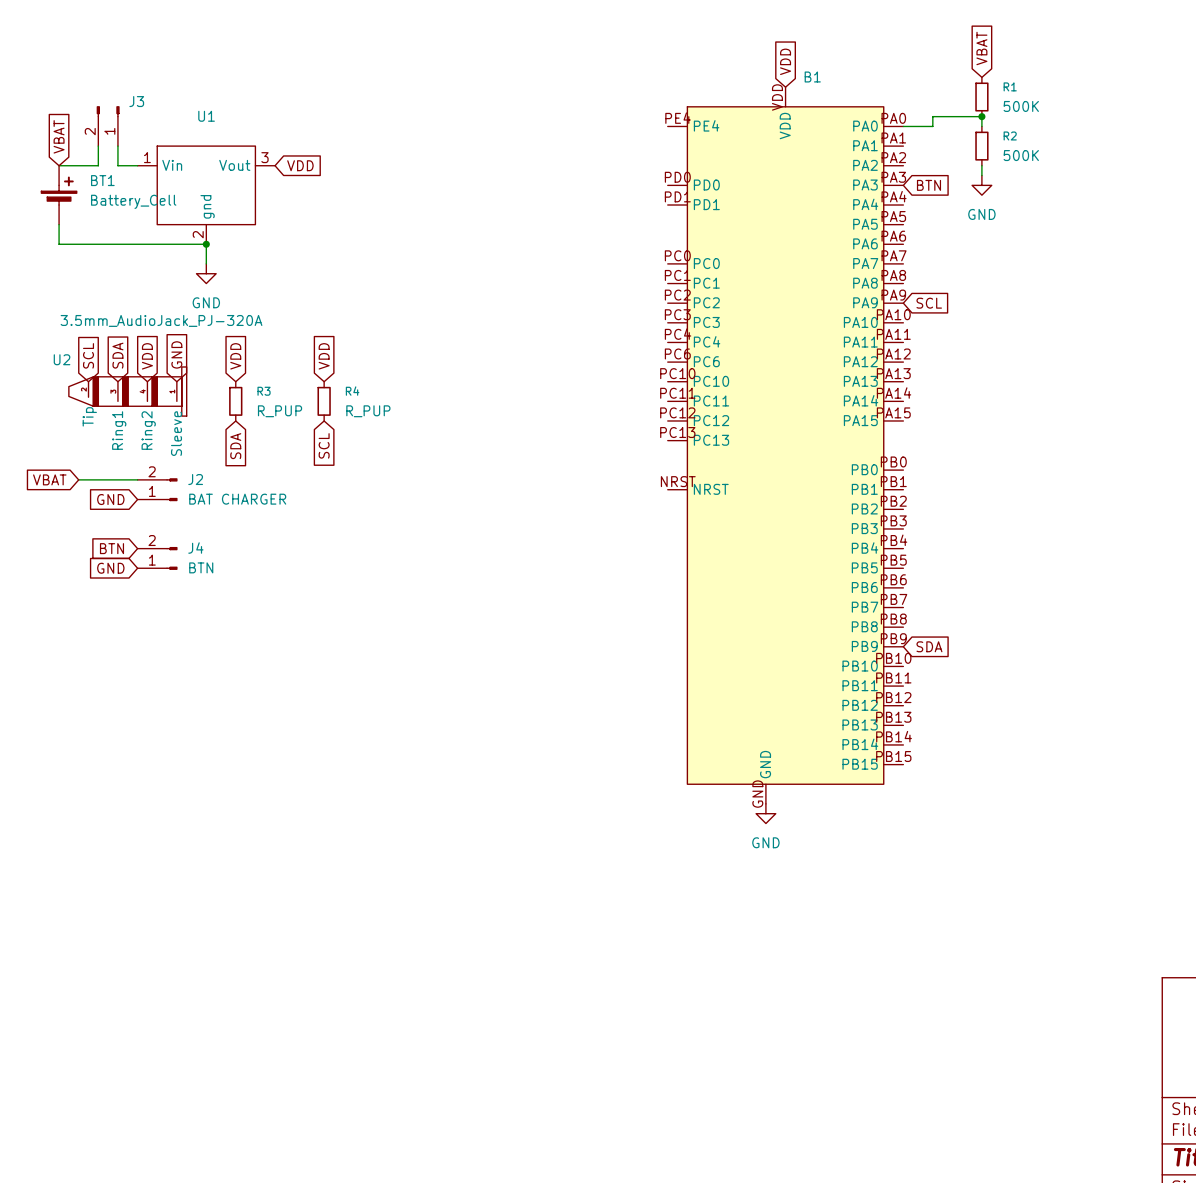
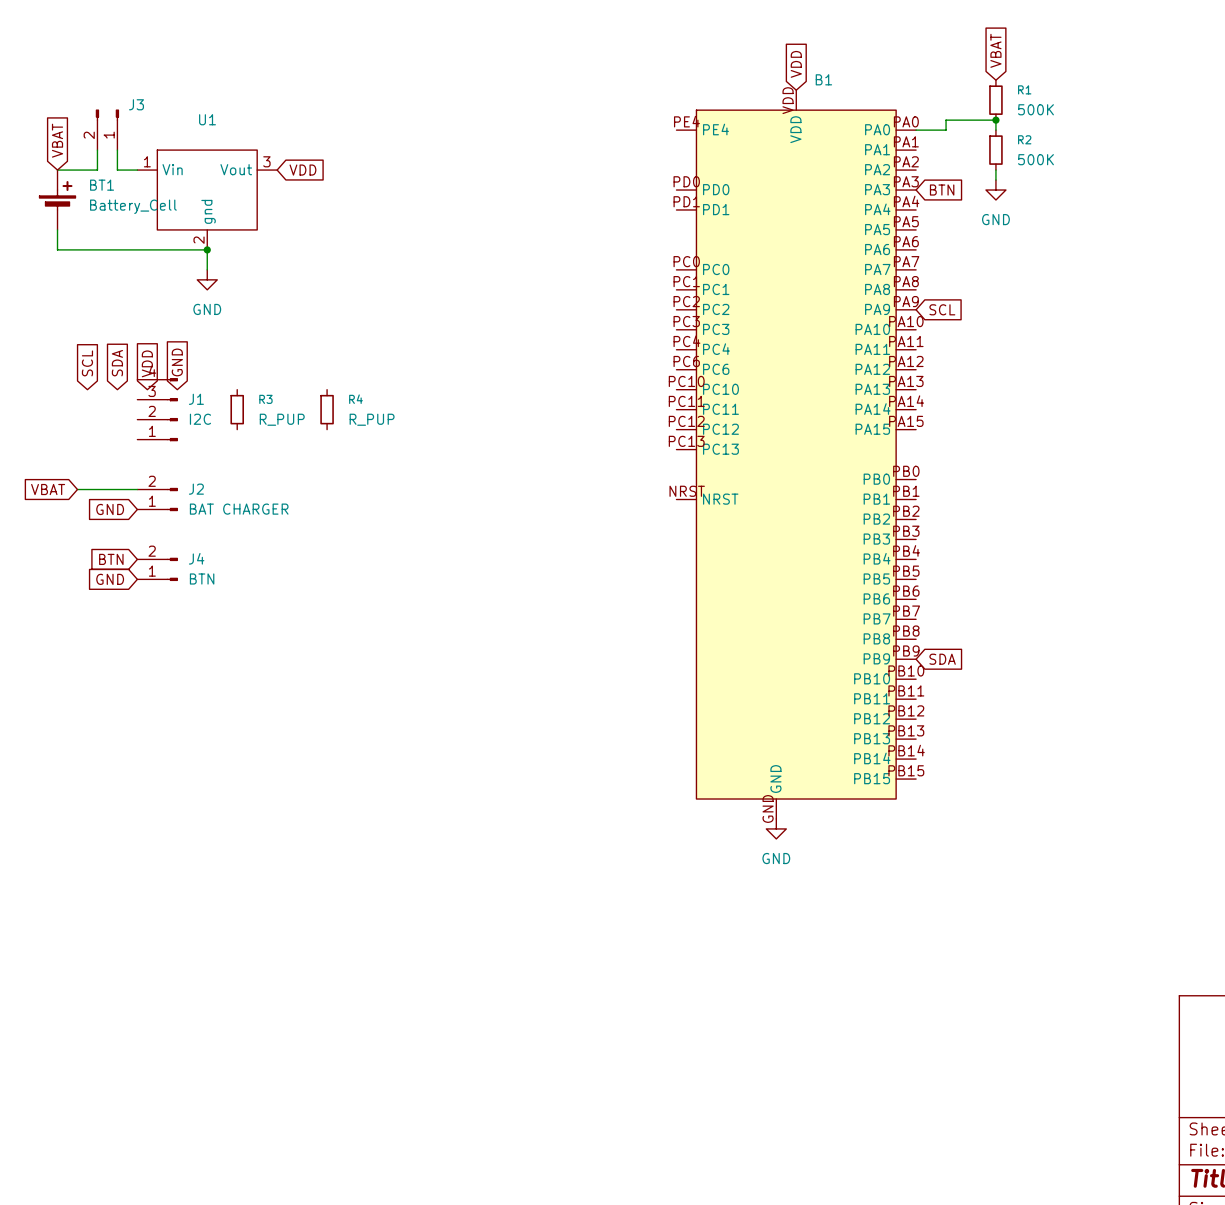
global label: VDD (235, 356) -> none
global label: VDD (324, 356) -> none
U2: 3.5mm_AudioJack_PJ-320A (127, 391) -> none
J1: none -> I2C (157, 409)
global label: SCL (324, 445) -> none
global label: SDA (235, 446) -> none

